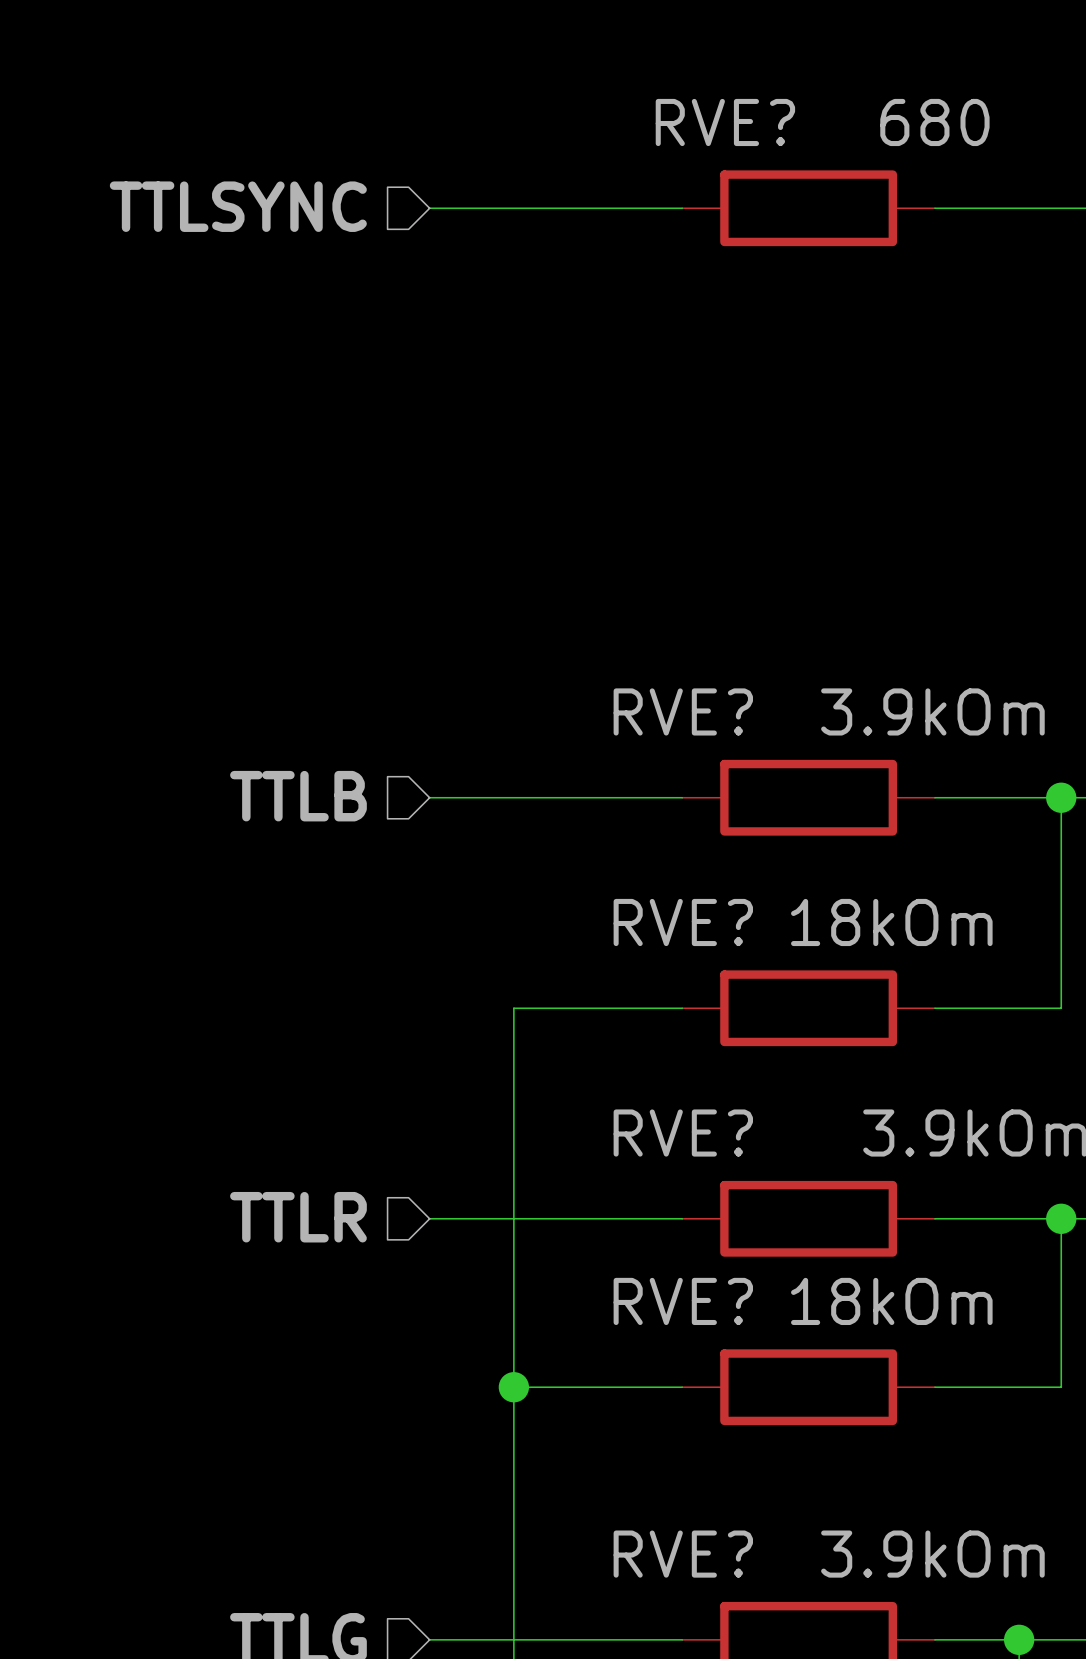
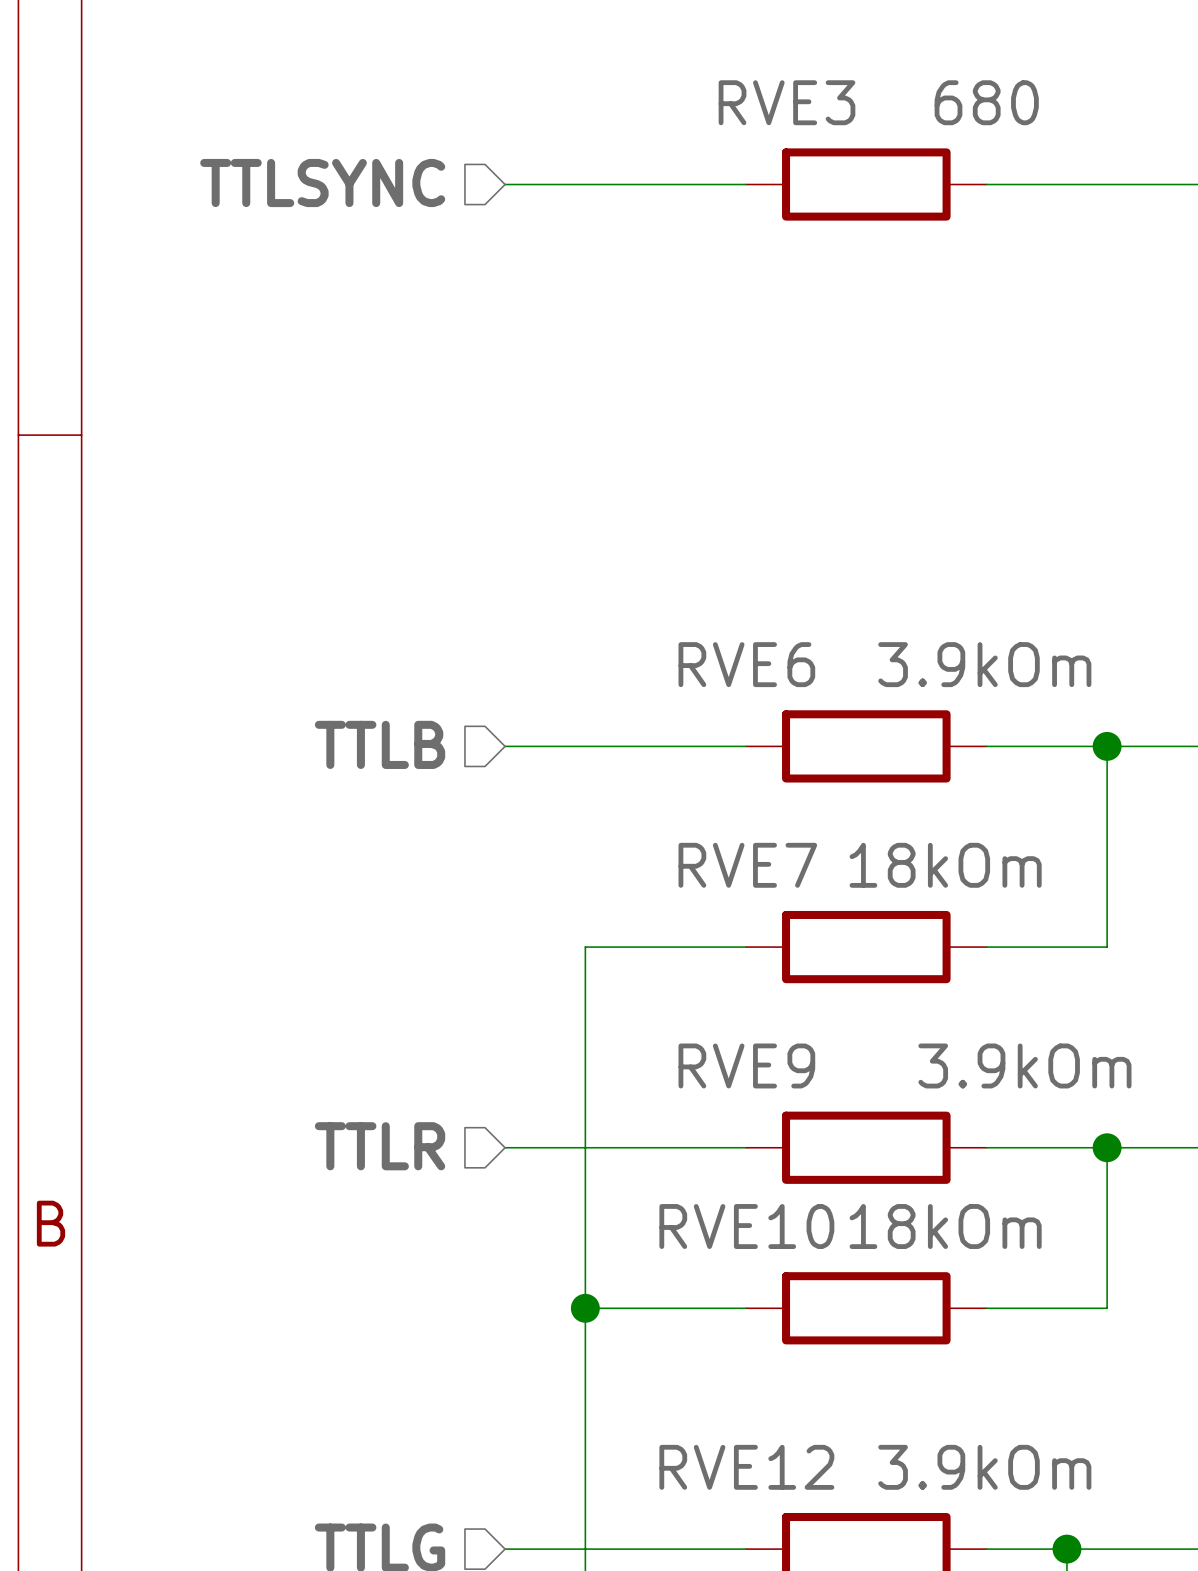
RVE? name: RVE? (725, 122) -> RVE3 (786, 102)
RVE? name: RVE? (683, 711) -> RVE6 (746, 664)
RVE? name: RVE? (683, 922) -> RVE7 (747, 865)
RVE? name: RVE? (683, 1133) -> RVE9 (746, 1065)
RVE? name: RVE? (683, 1301) -> RVE10 (746, 1226)
RVE? name: RVE? (683, 1554) -> RVE12 (746, 1467)

